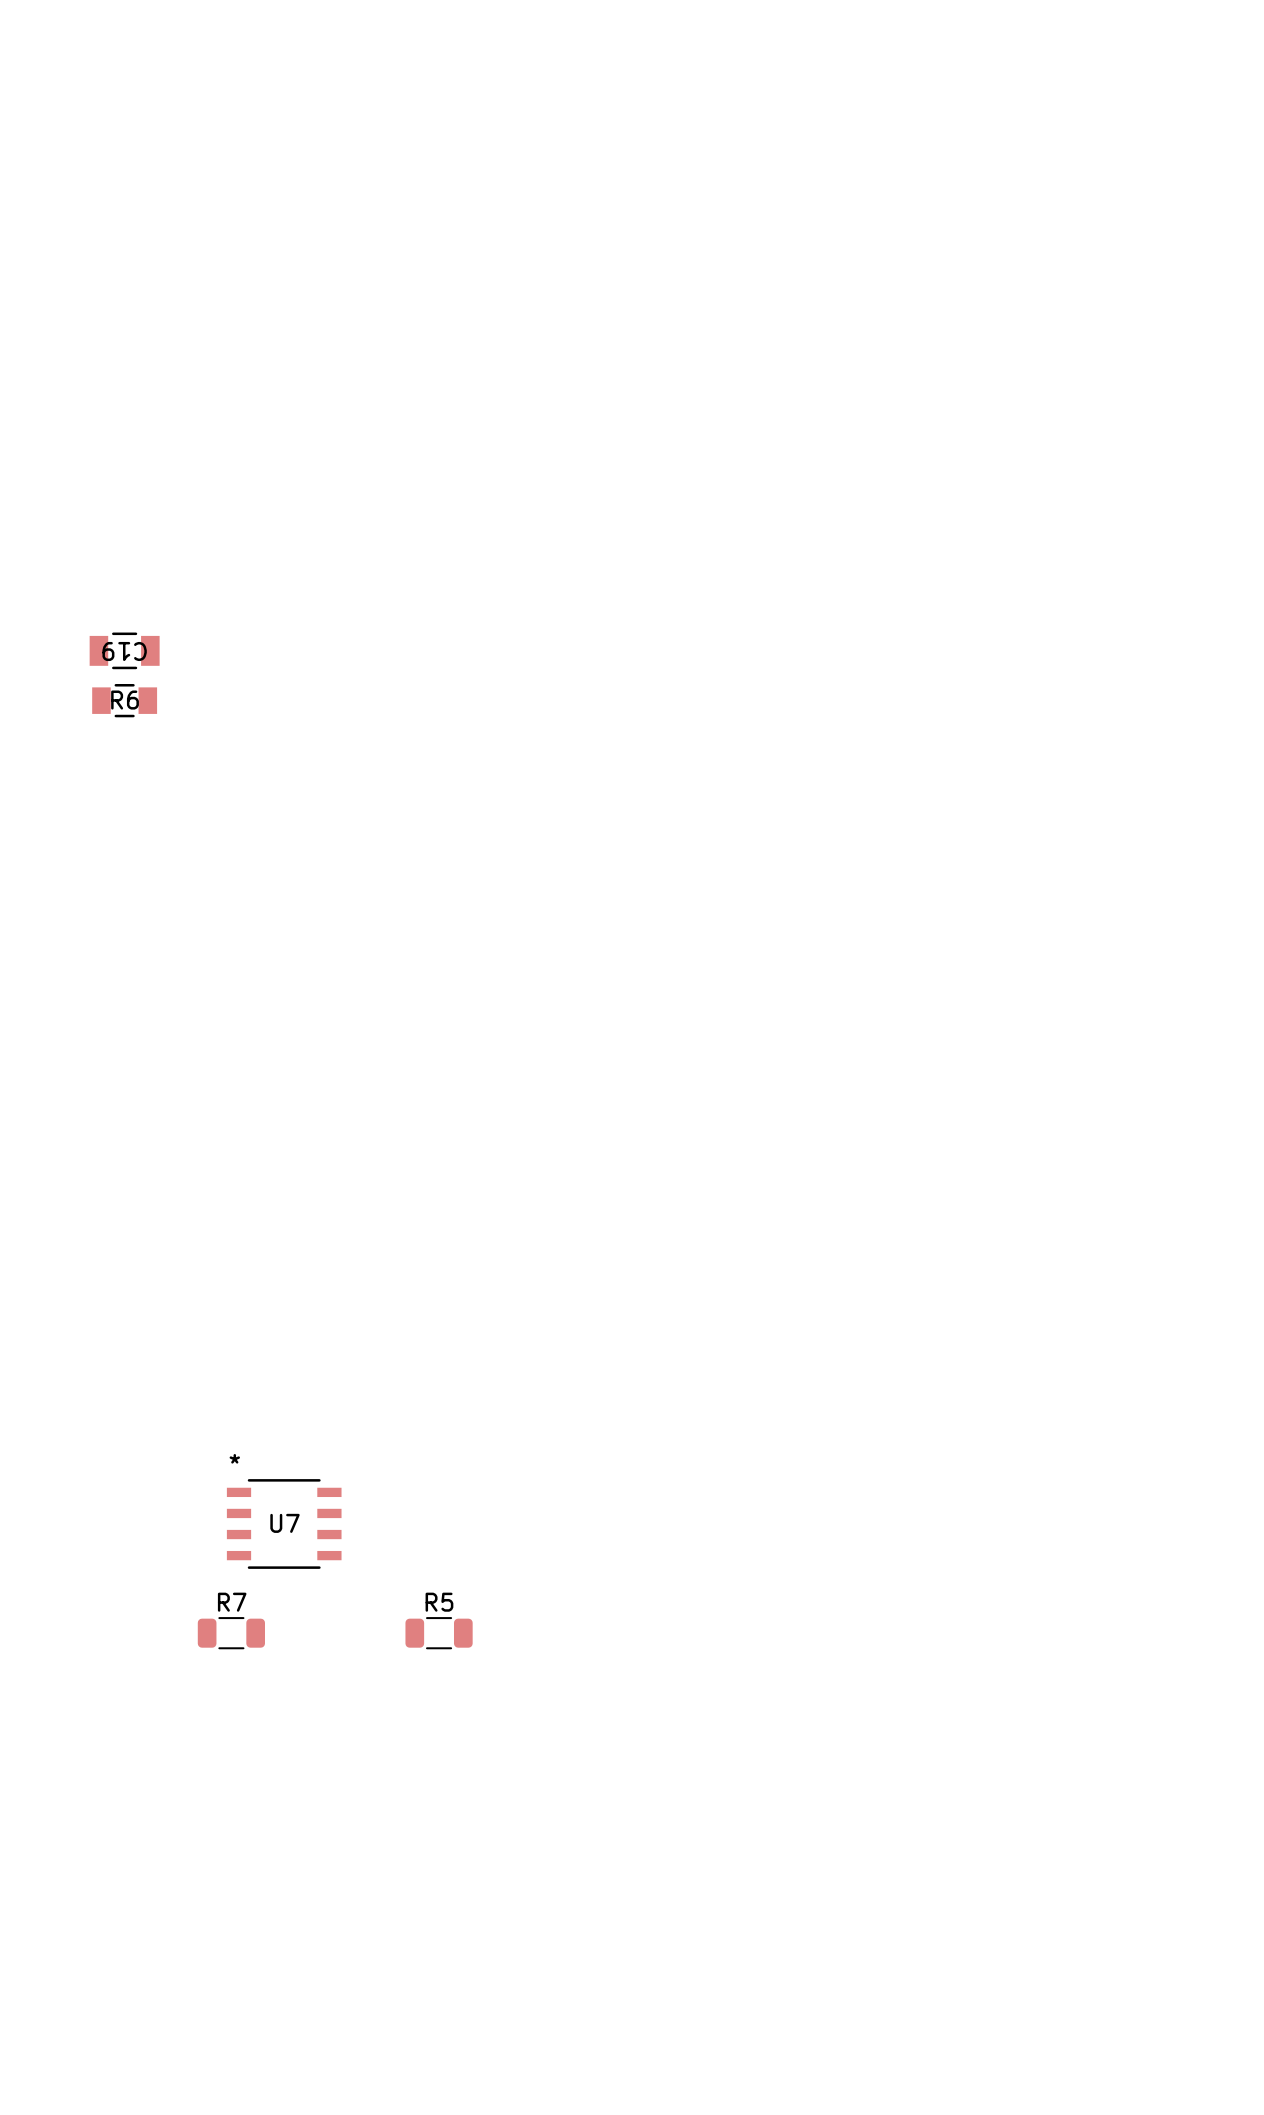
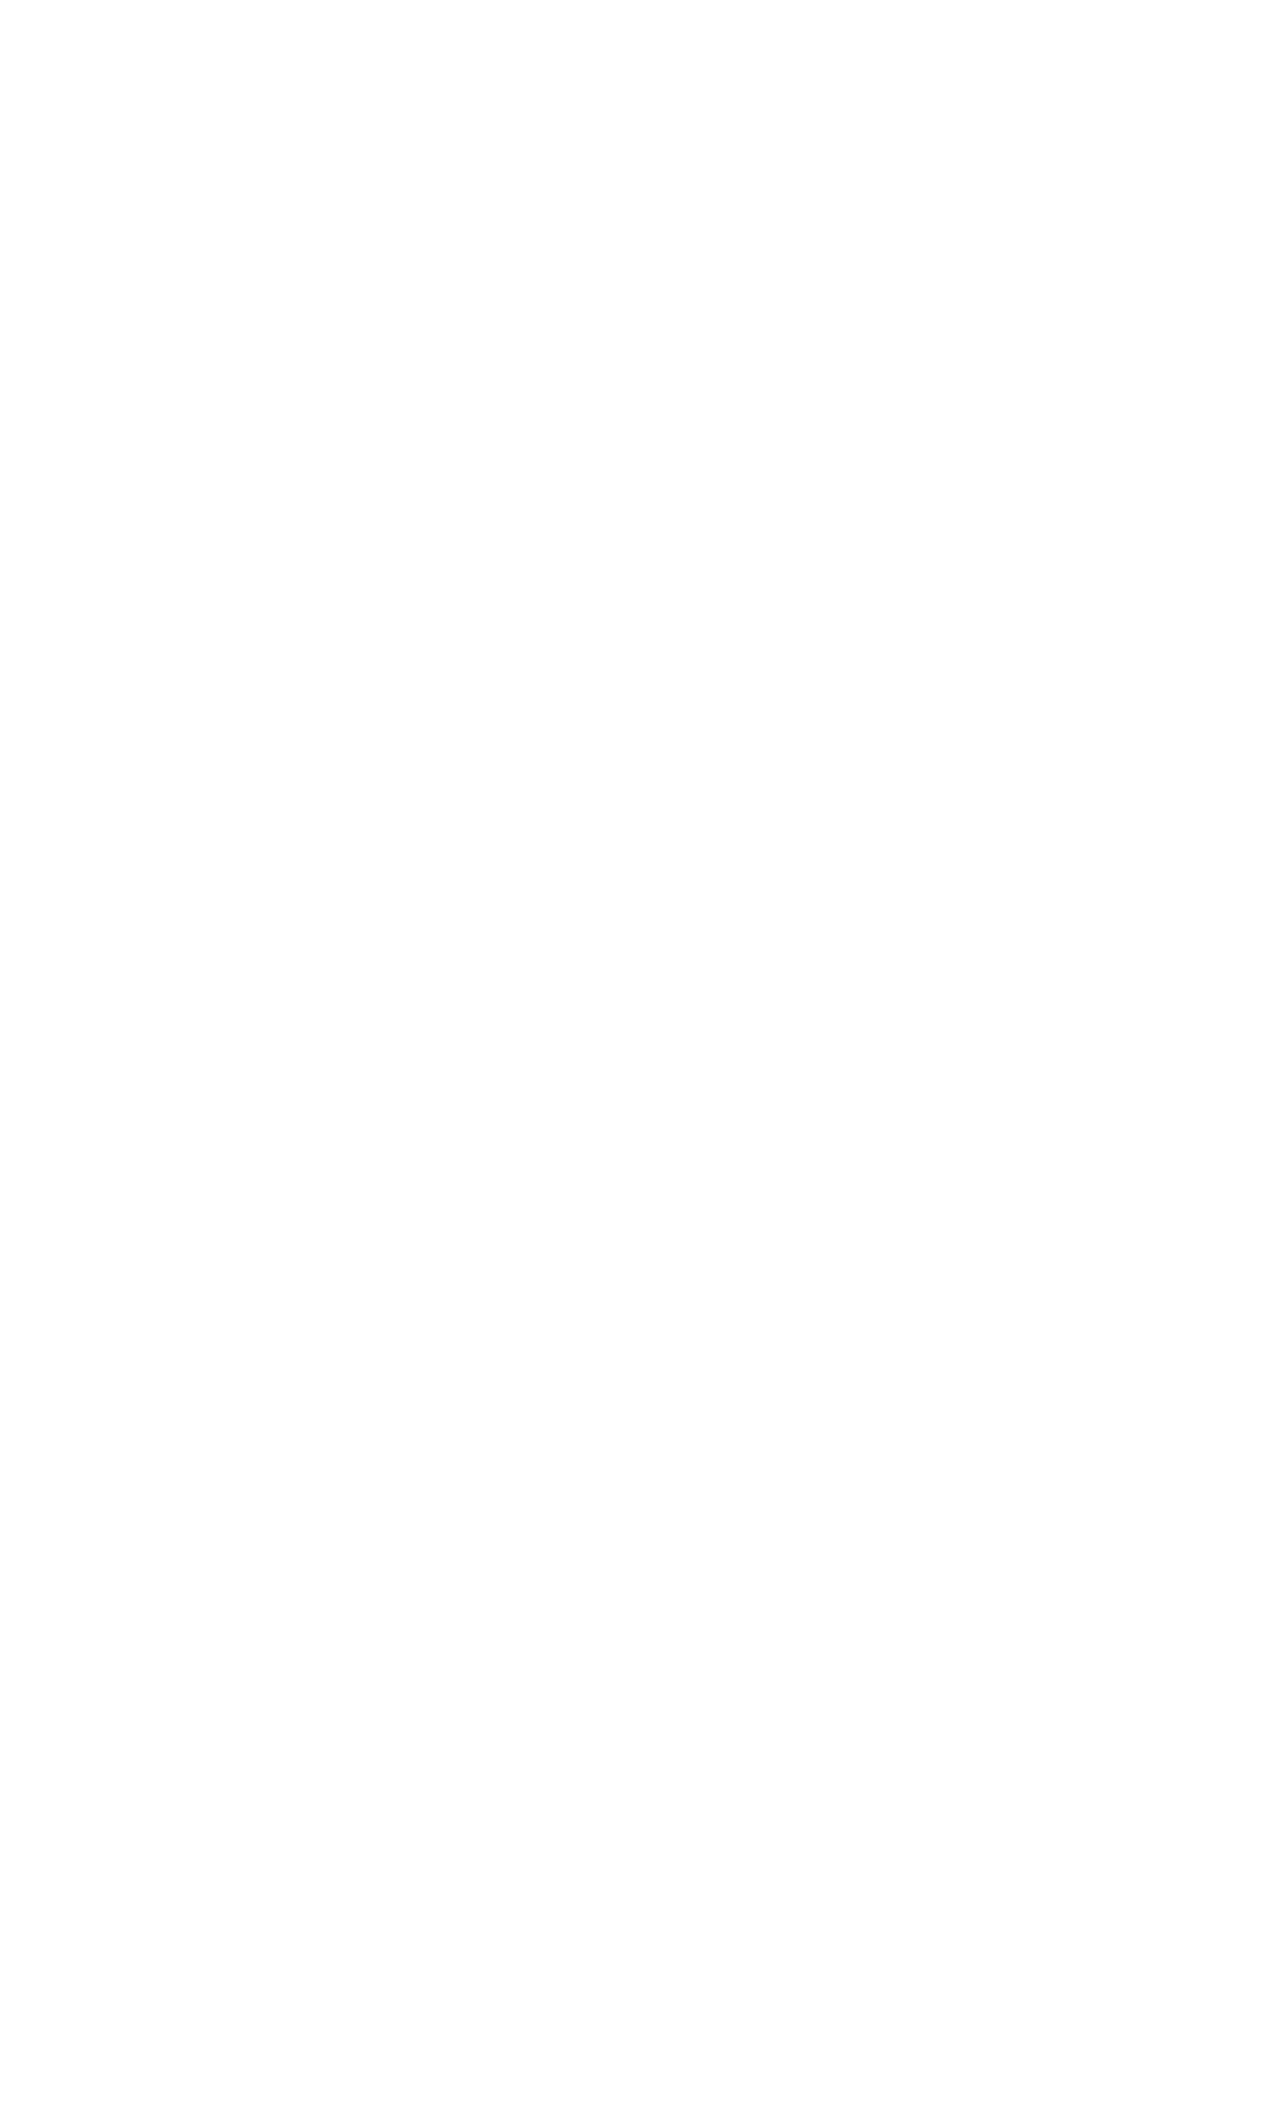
C19: (124, 650) -> none
R6: (124, 700) -> none
U7: (284, 1523) -> none
R7: (231, 1633) -> none
R5: (439, 1633) -> none

